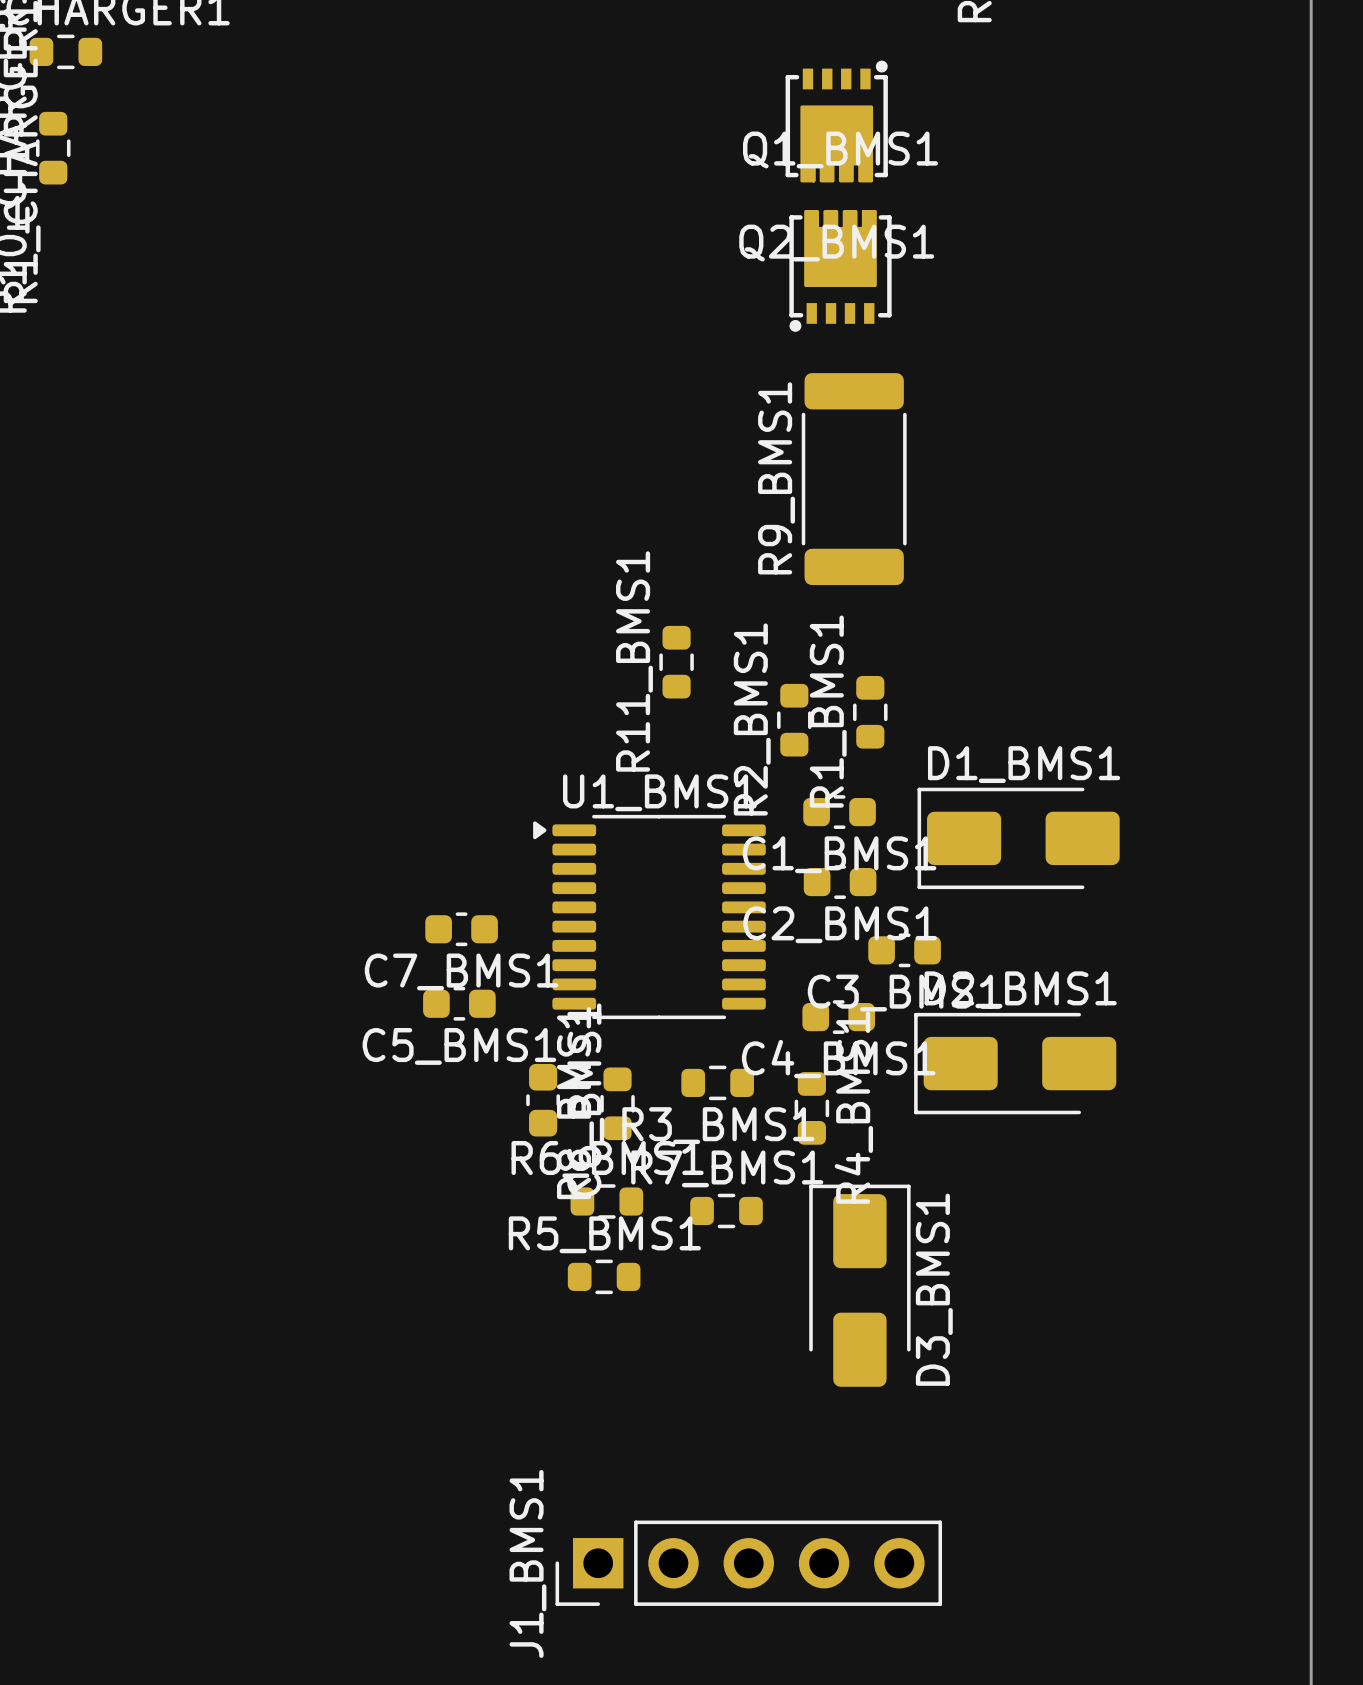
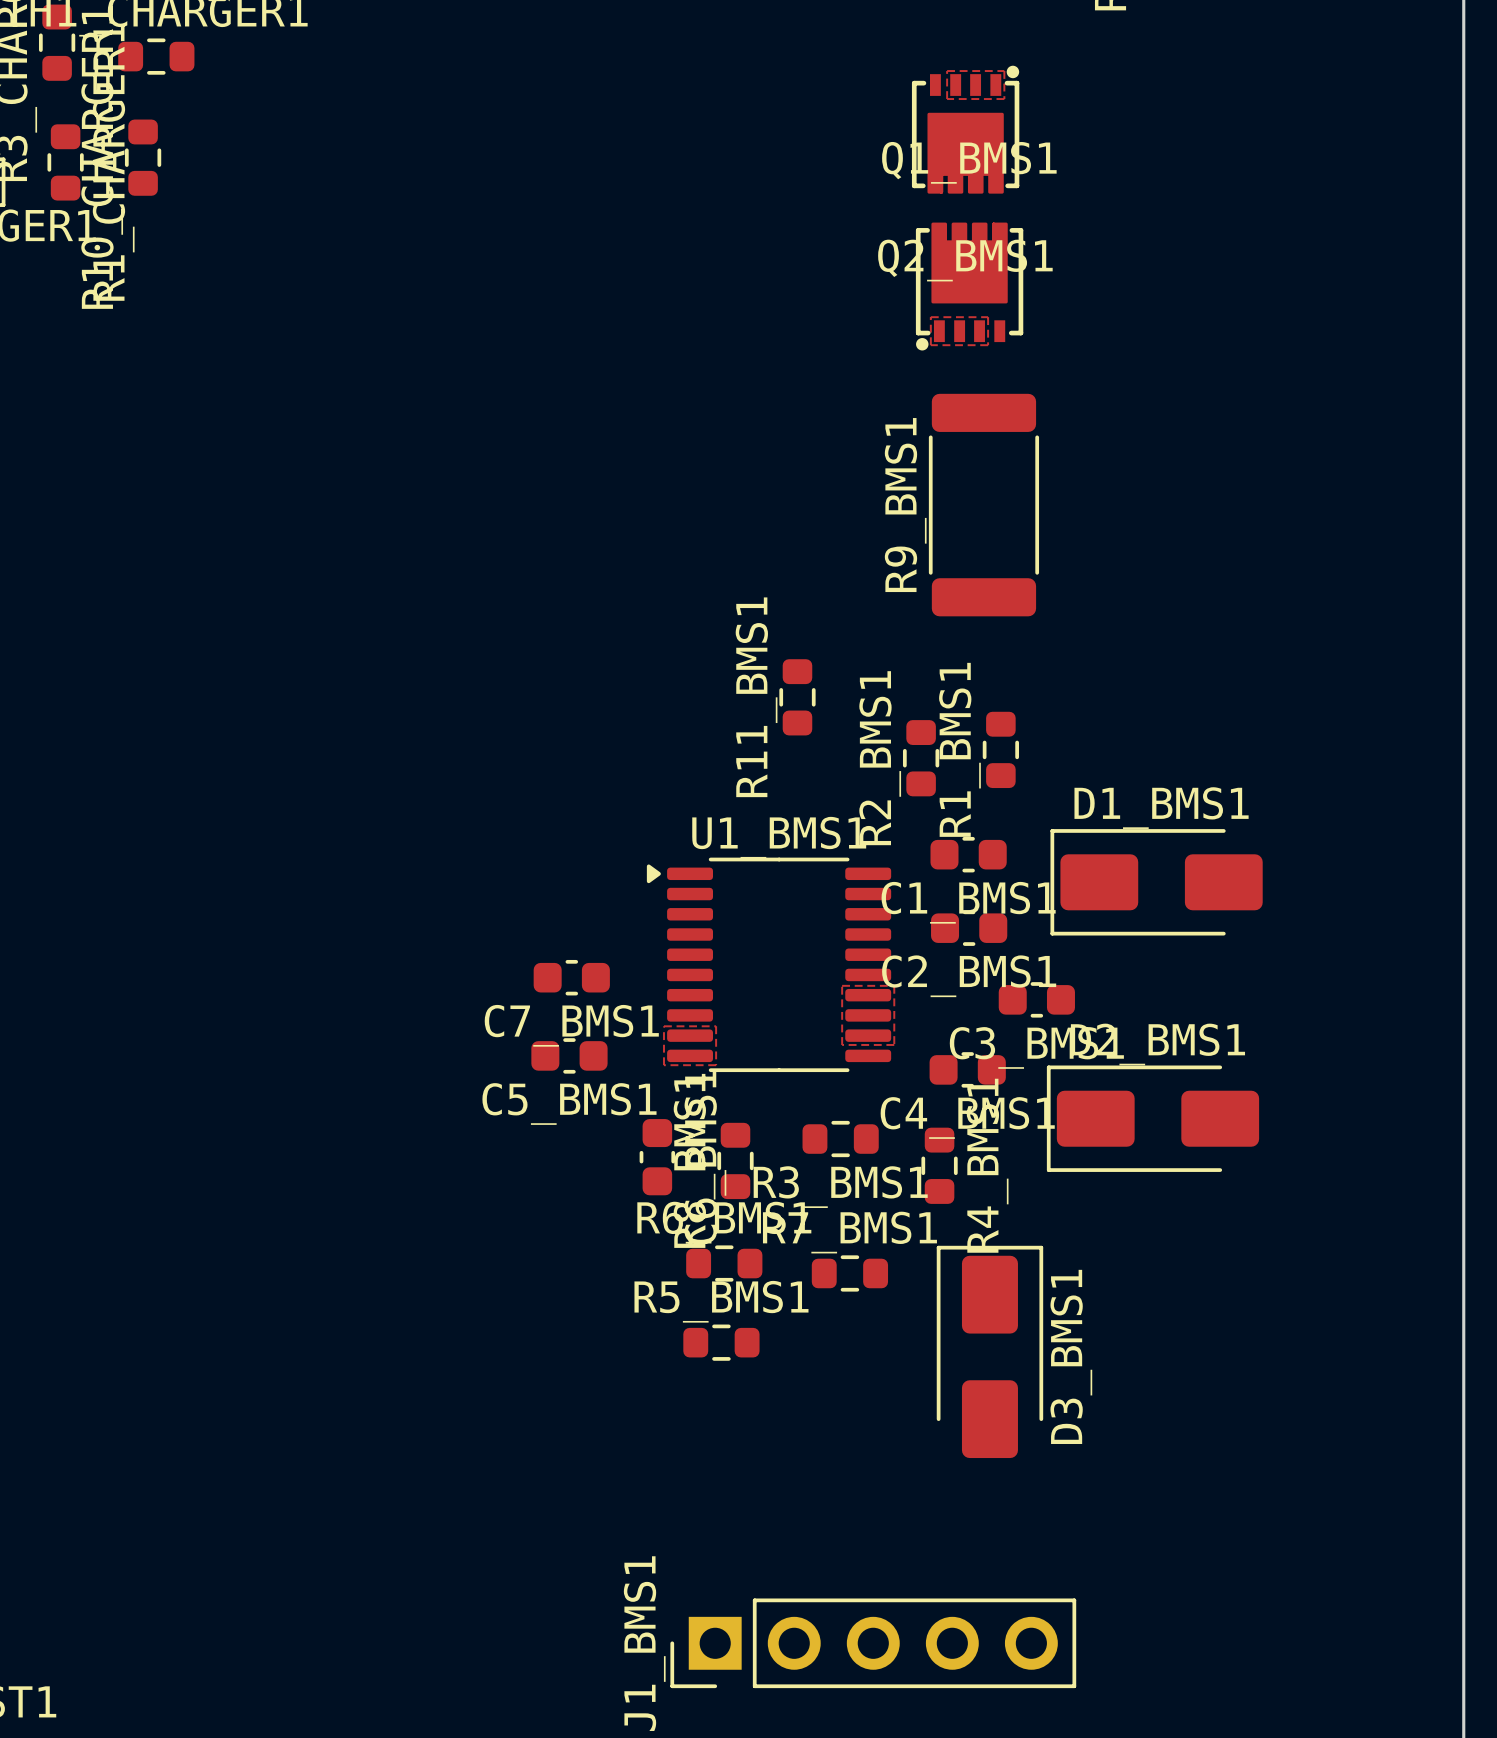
zone outline: none -> (947, 71) (1004, 71) (1004, 99) (947, 99) (947, 71)
zone outline: none -> (930, 317) (988, 317) (988, 345) (930, 345) (930, 317)
zone outline: none -> (842, 985) (894, 985) (894, 1044) (842, 1044) (842, 985)
zone outline: none -> (663, 1026) (716, 1026) (716, 1065) (663, 1065) (663, 1026)

